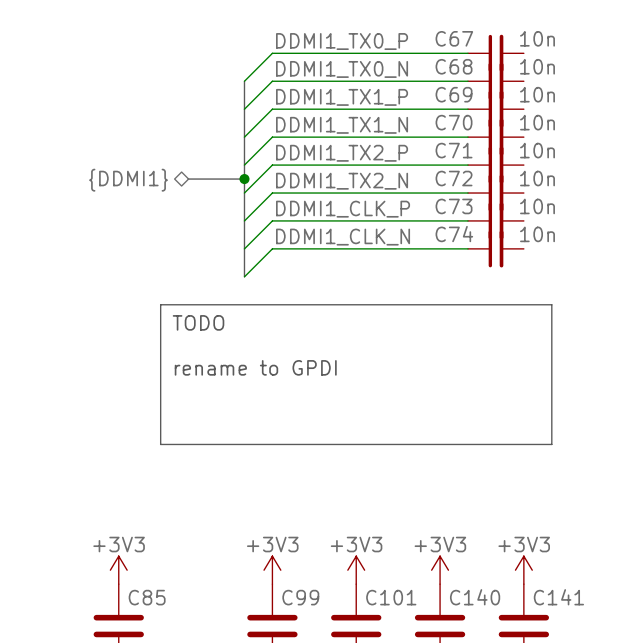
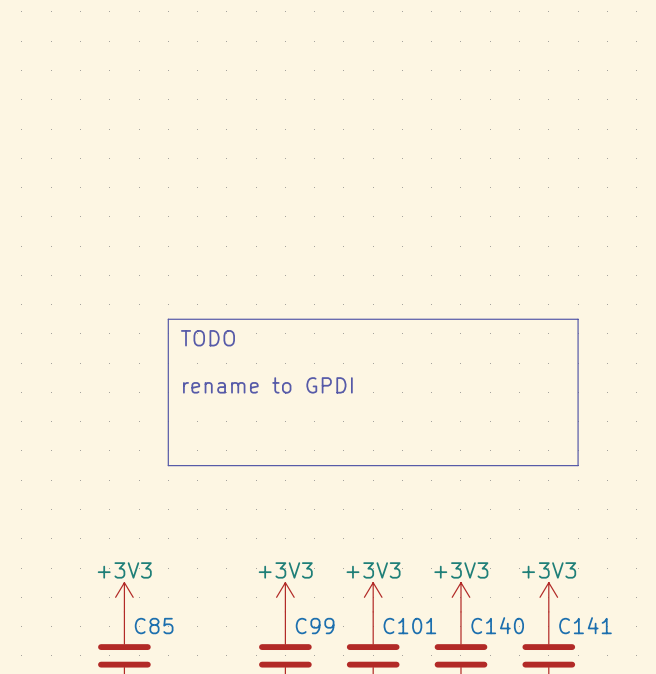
label: DDMI1_TX0_P (342, 41) -> none
wire: (467, 53) (272, 53) (244, 81) -> none
C67: 10n (495, 53) -> none
label: DDMI1_TX0_N (342, 69) -> none
bus: (244, 81) (244, 276) -> none
wire: (467, 81) (272, 81) (244, 109) -> none
C68: 10n (495, 81) -> none
label: DDMI1_TX1_P (342, 97) -> none
wire: (467, 109) (272, 109) (244, 137) -> none
C69: 10n (495, 109) -> none
label: DDMI1_TX1_N (342, 125) -> none
wire: (467, 137) (272, 137) (244, 165) -> none
C70: 10n (495, 137) -> none
label: DDMI1_TX2_P (342, 153) -> none
wire: (467, 165) (272, 165) (244, 193) -> none
C71: 10n (495, 165) -> none
bus: (188, 179) (244, 179) -> none
junction: (244, 179) -> none
hierarchical label: {DDMI1} (128, 180) -> none
label: DDMI1_TX2_N (342, 181) -> none
wire: (467, 193) (272, 193) (244, 220) -> none
C72: 10n (495, 193) -> none
label: DDMI1_CLK_P (343, 209) -> none
wire: (467, 220) (272, 220) (244, 248) -> none
C73: 10n (495, 220) -> none
label: DDMI1_CLK_N (343, 237) -> none
wire: (467, 248) (272, 248) (244, 276) -> none
C74: 10n (495, 248) -> none

